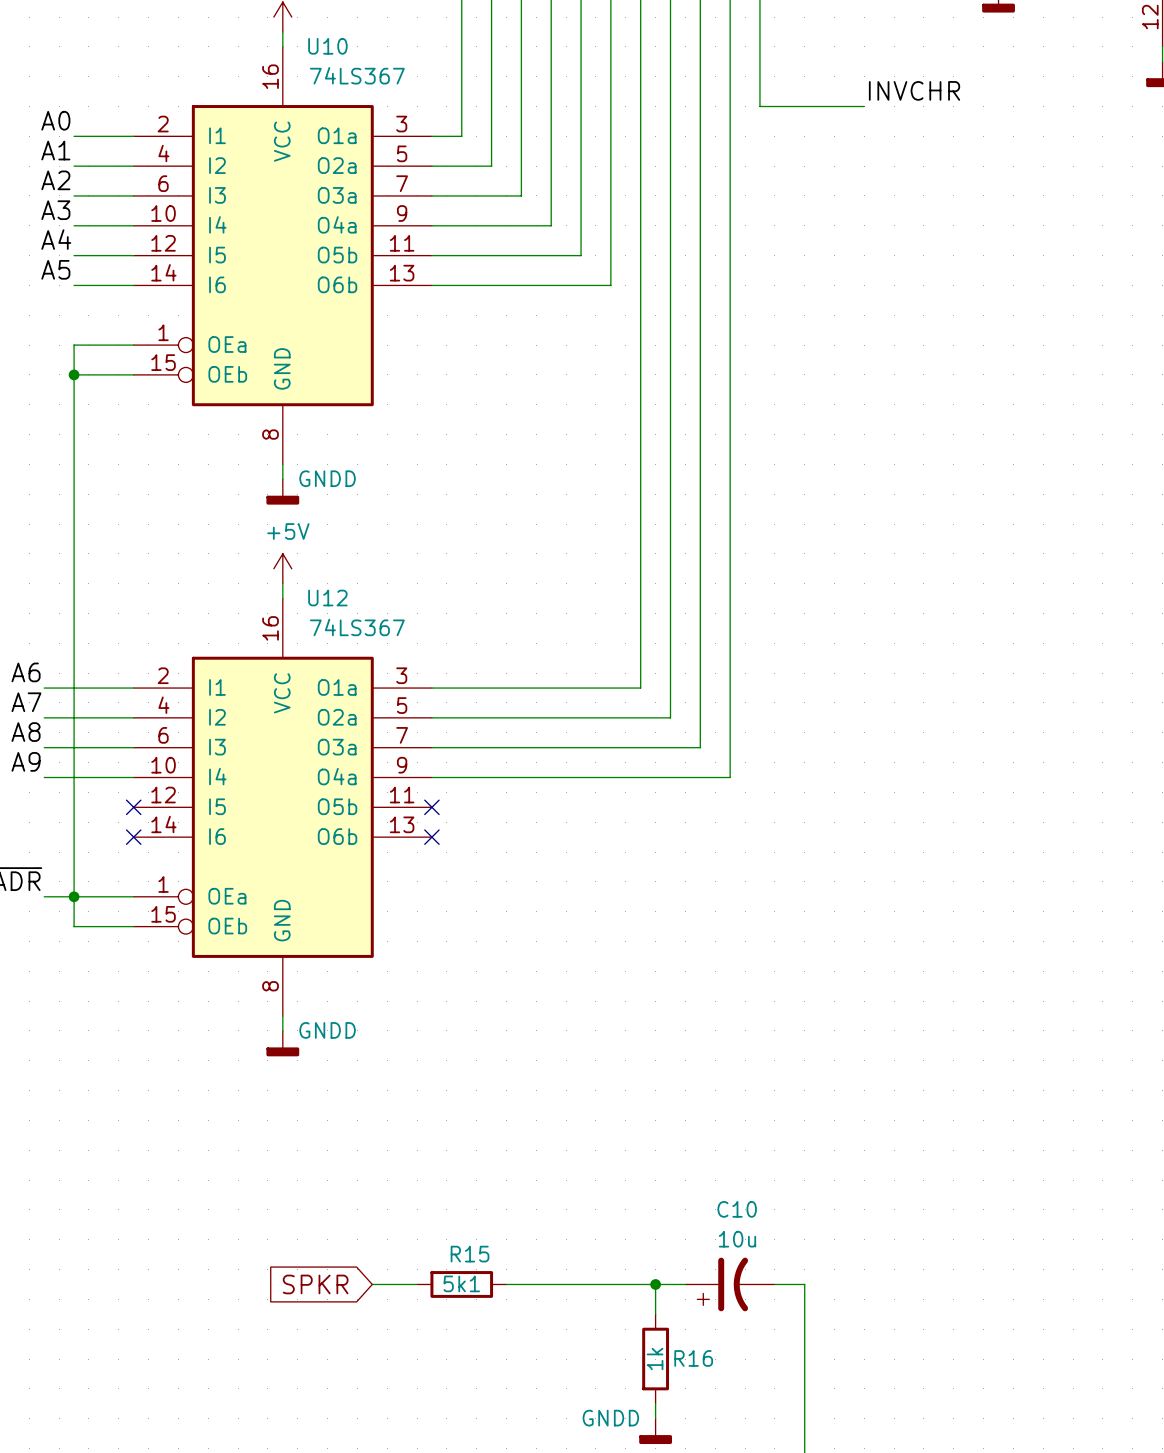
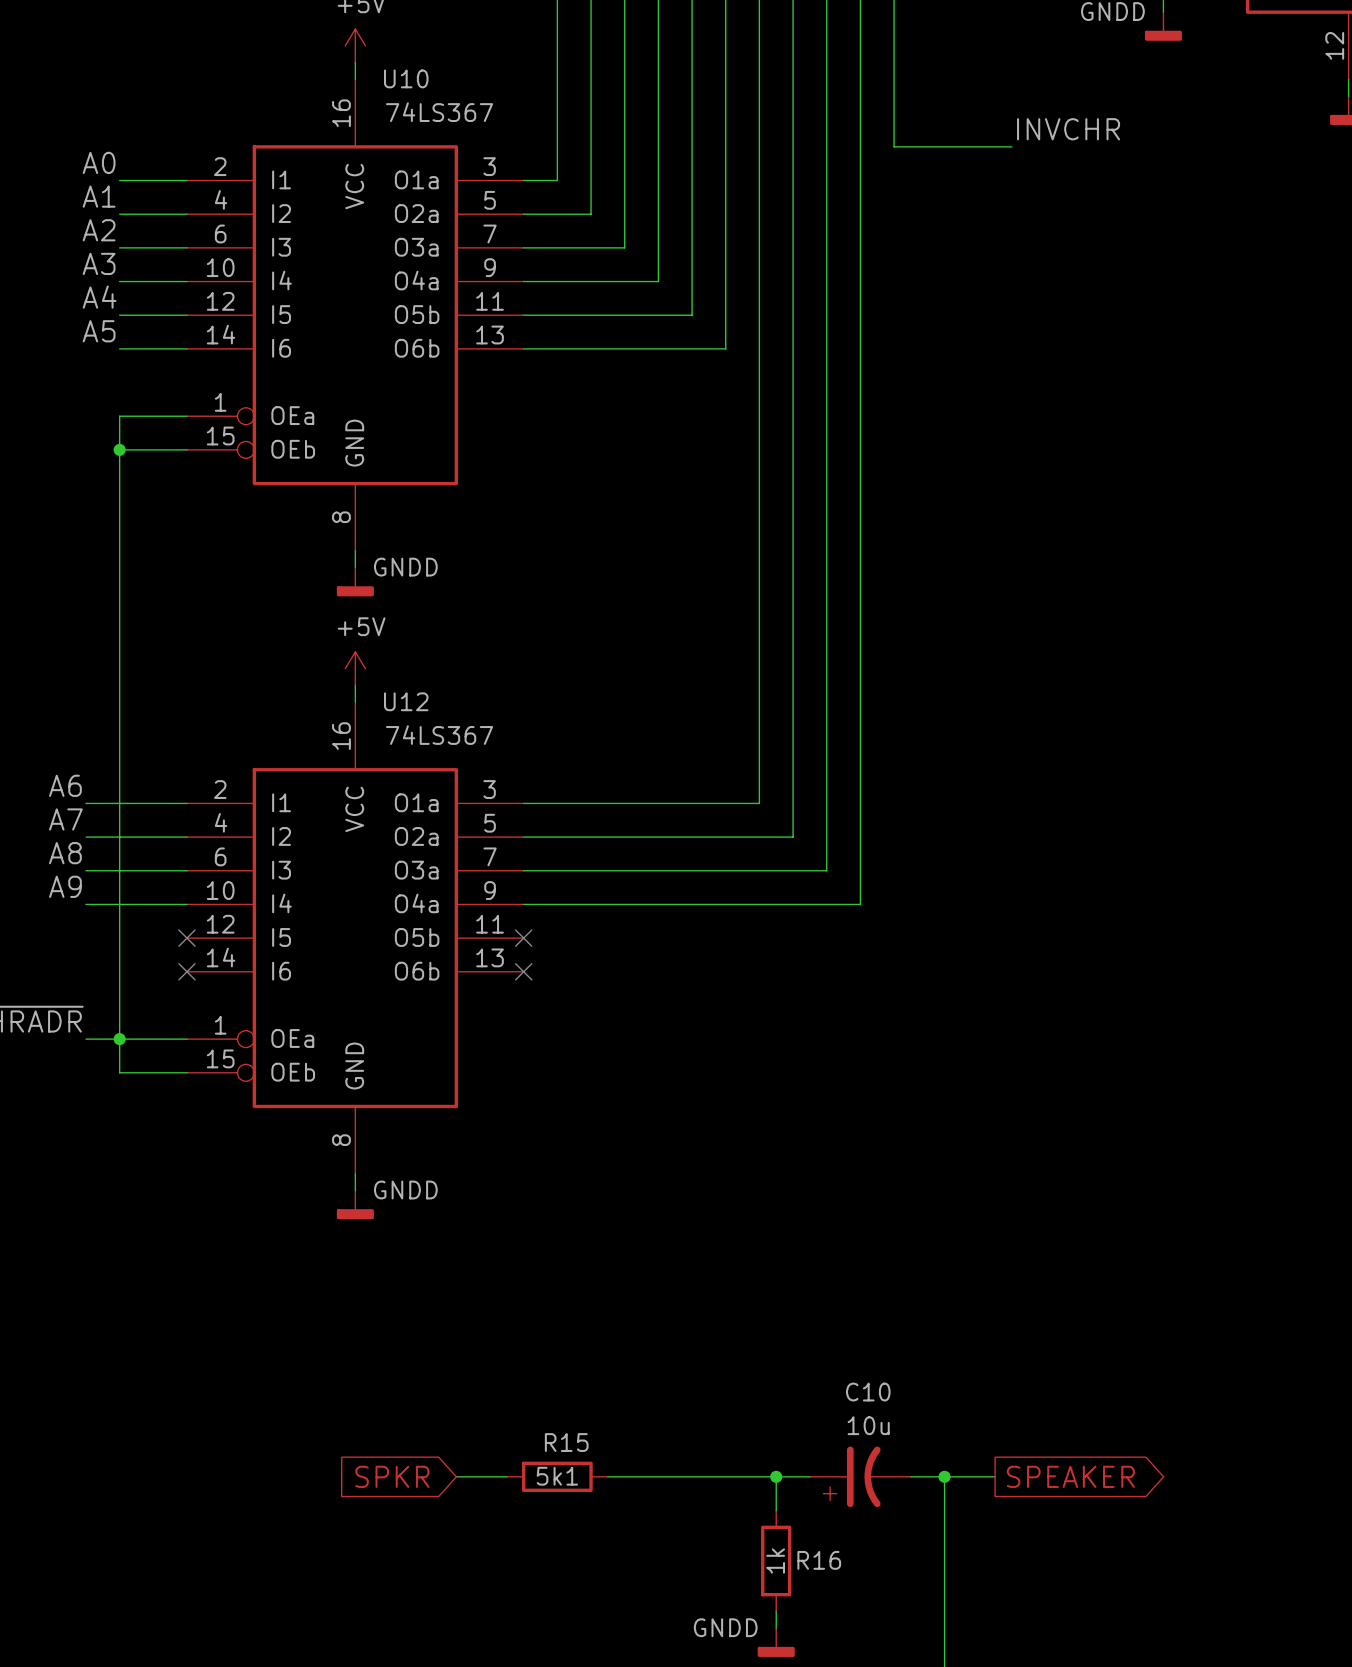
wire: none -> (944, 1476) (995, 1476)
junction: none -> (944, 1476)
global label: none -> SPEAKER (1070, 1476)

